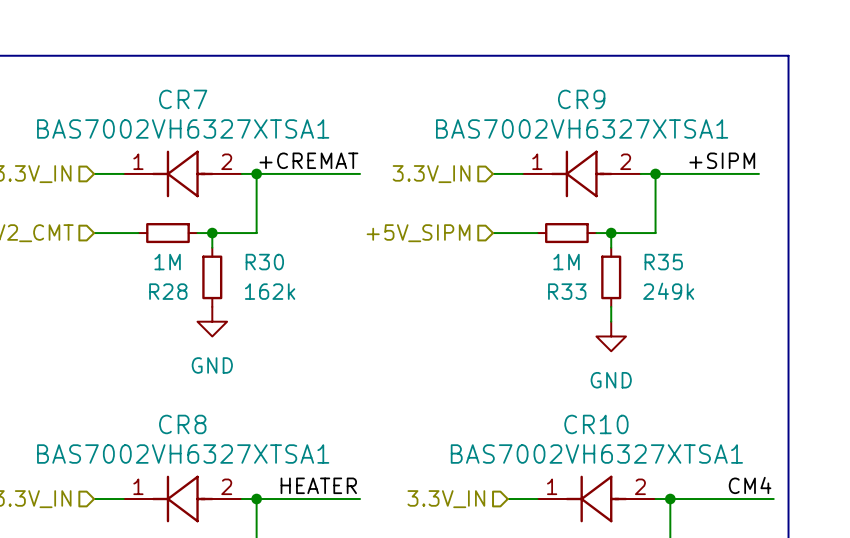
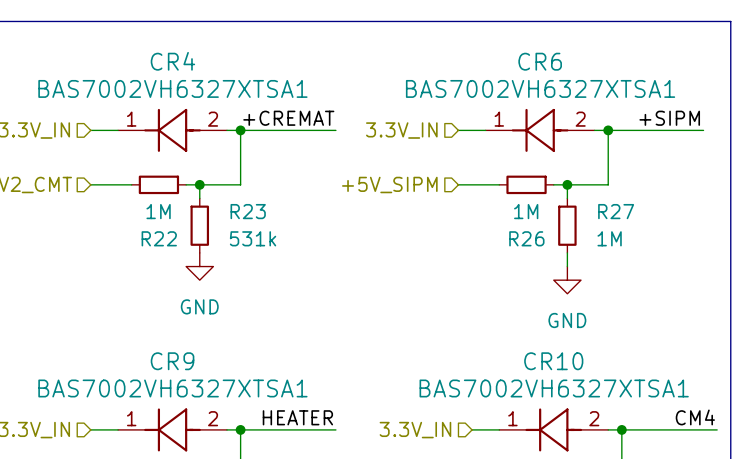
CR7 name: CR7 (183, 99) -> CR4 (172, 61)
CR9 name: CR9 (581, 99) -> CR6 (540, 61)
R30 name: R30 (264, 262) -> R23 (248, 211)
R35 name: R35 (663, 262) -> R27 (616, 211)
R28 name: R28 (168, 291) -> R22 (159, 238)
R30 value: 162k (270, 291) -> 531k (253, 238)
R33 name: R33 (567, 291) -> R26 (526, 238)
R35 value: 249k (668, 291) -> 1M (609, 238)
CR8 name: CR8 (182, 424) -> CR9 (172, 361)

